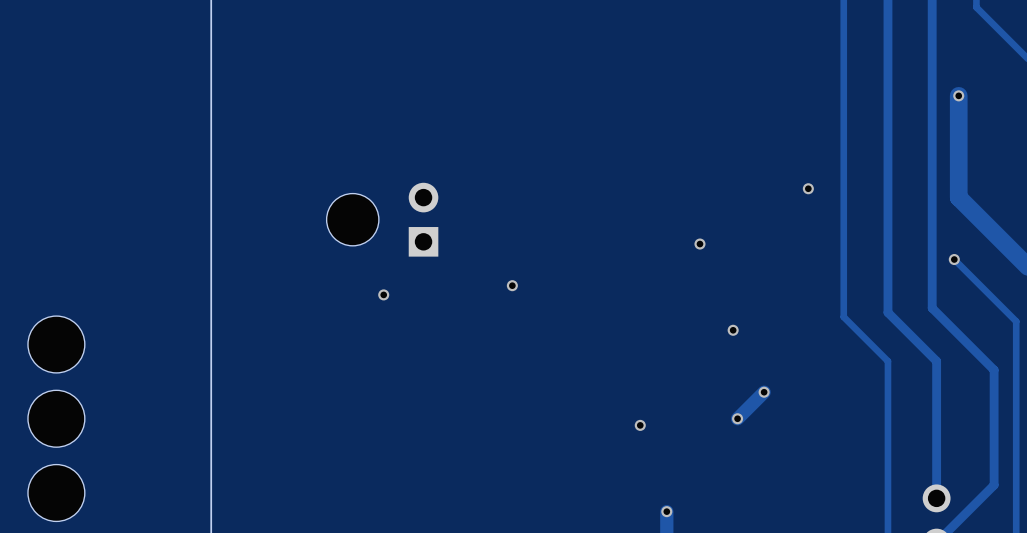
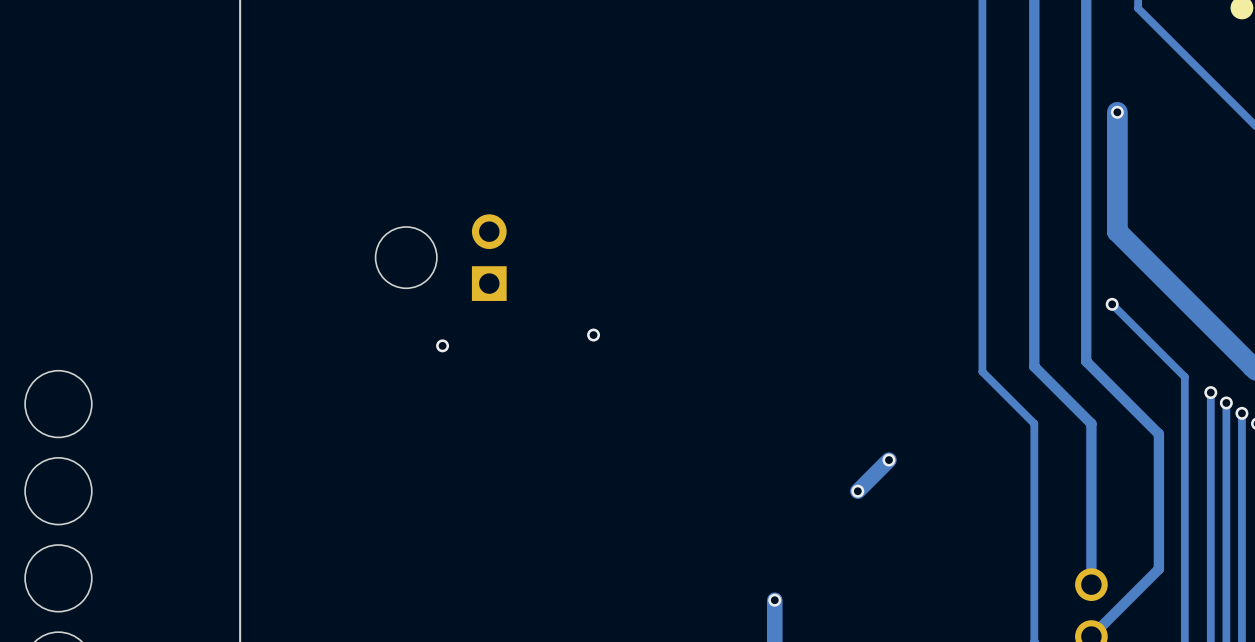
via: (808, 188) -> none
via: (699, 244) -> none
via: (733, 330) -> none
via: (640, 425) -> none

